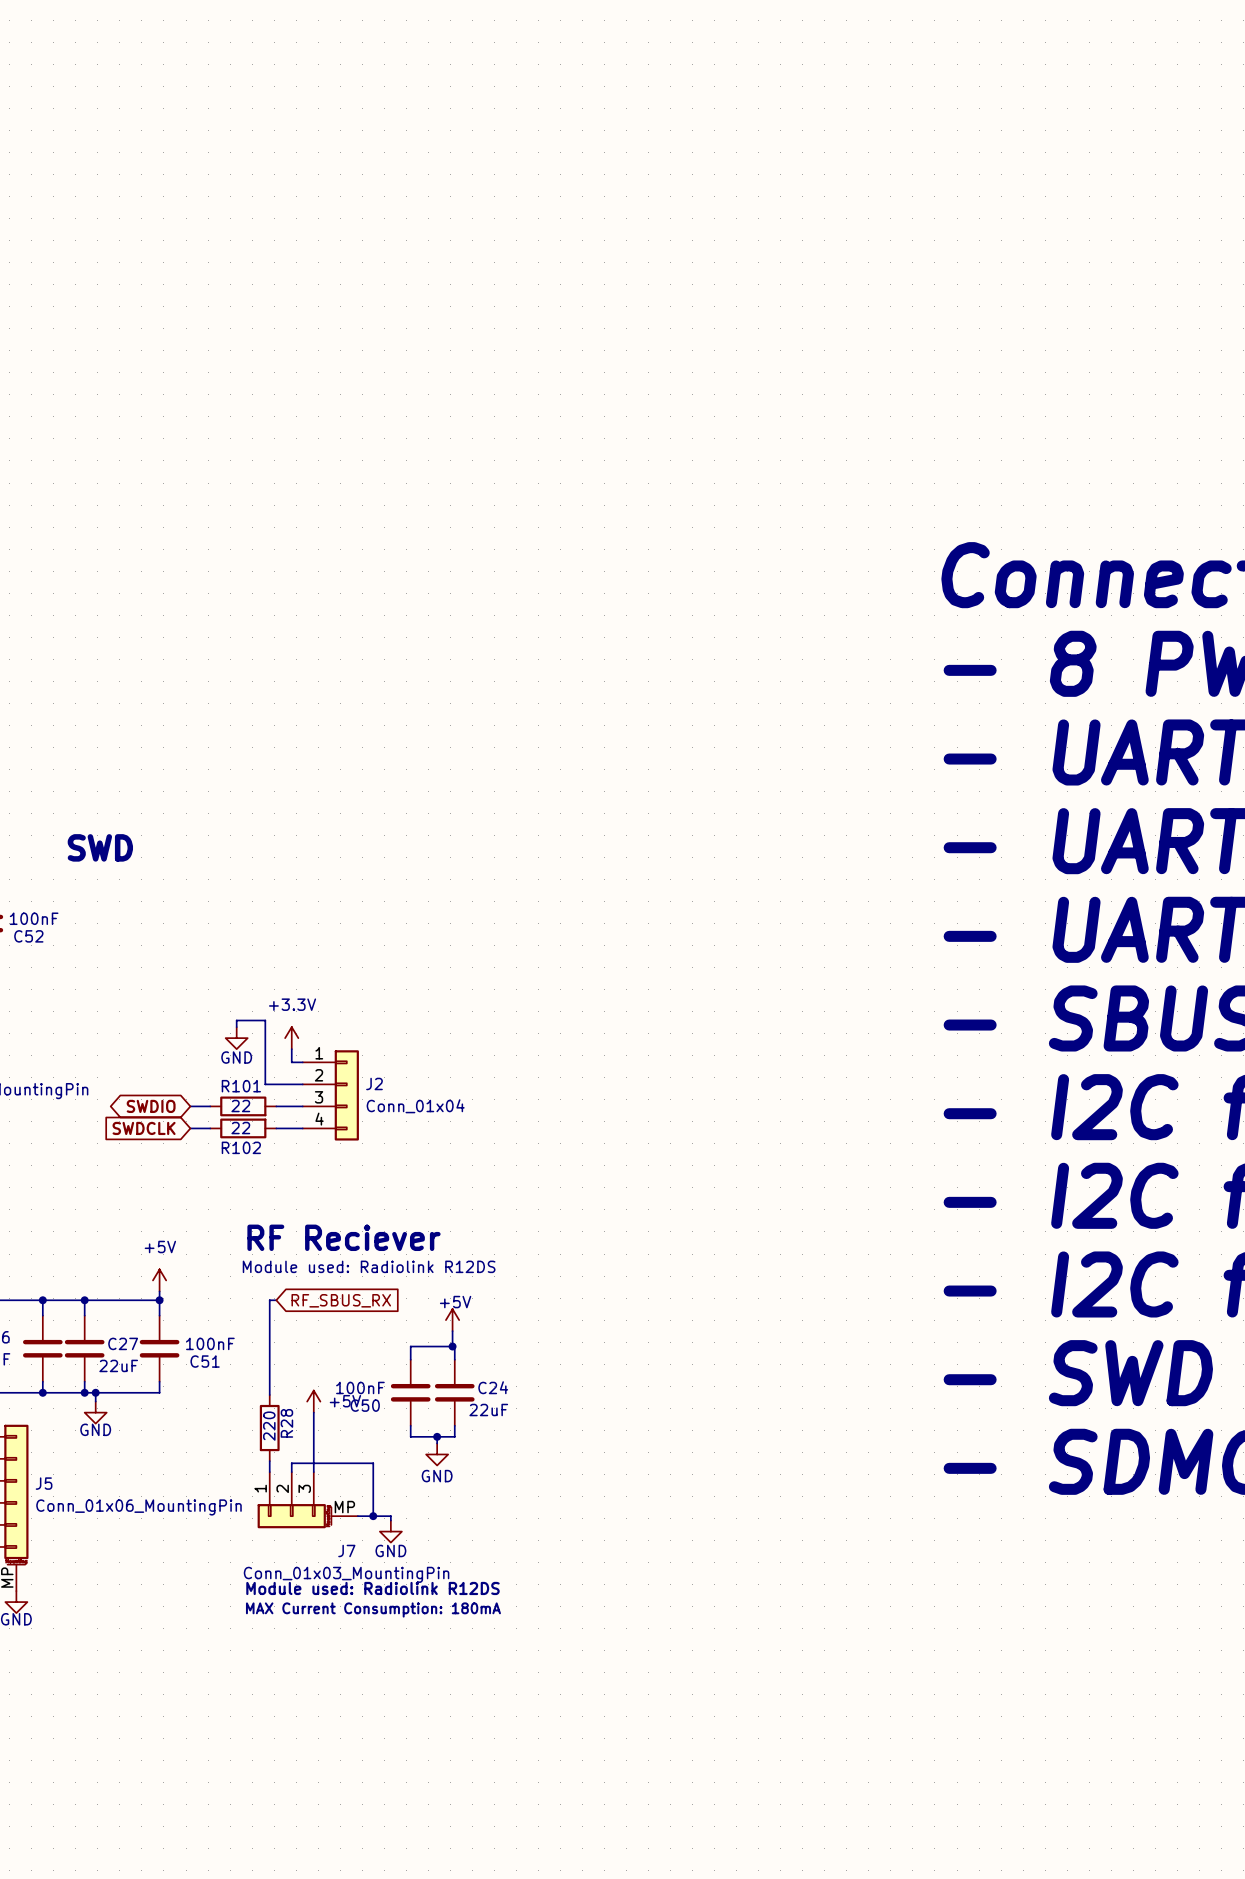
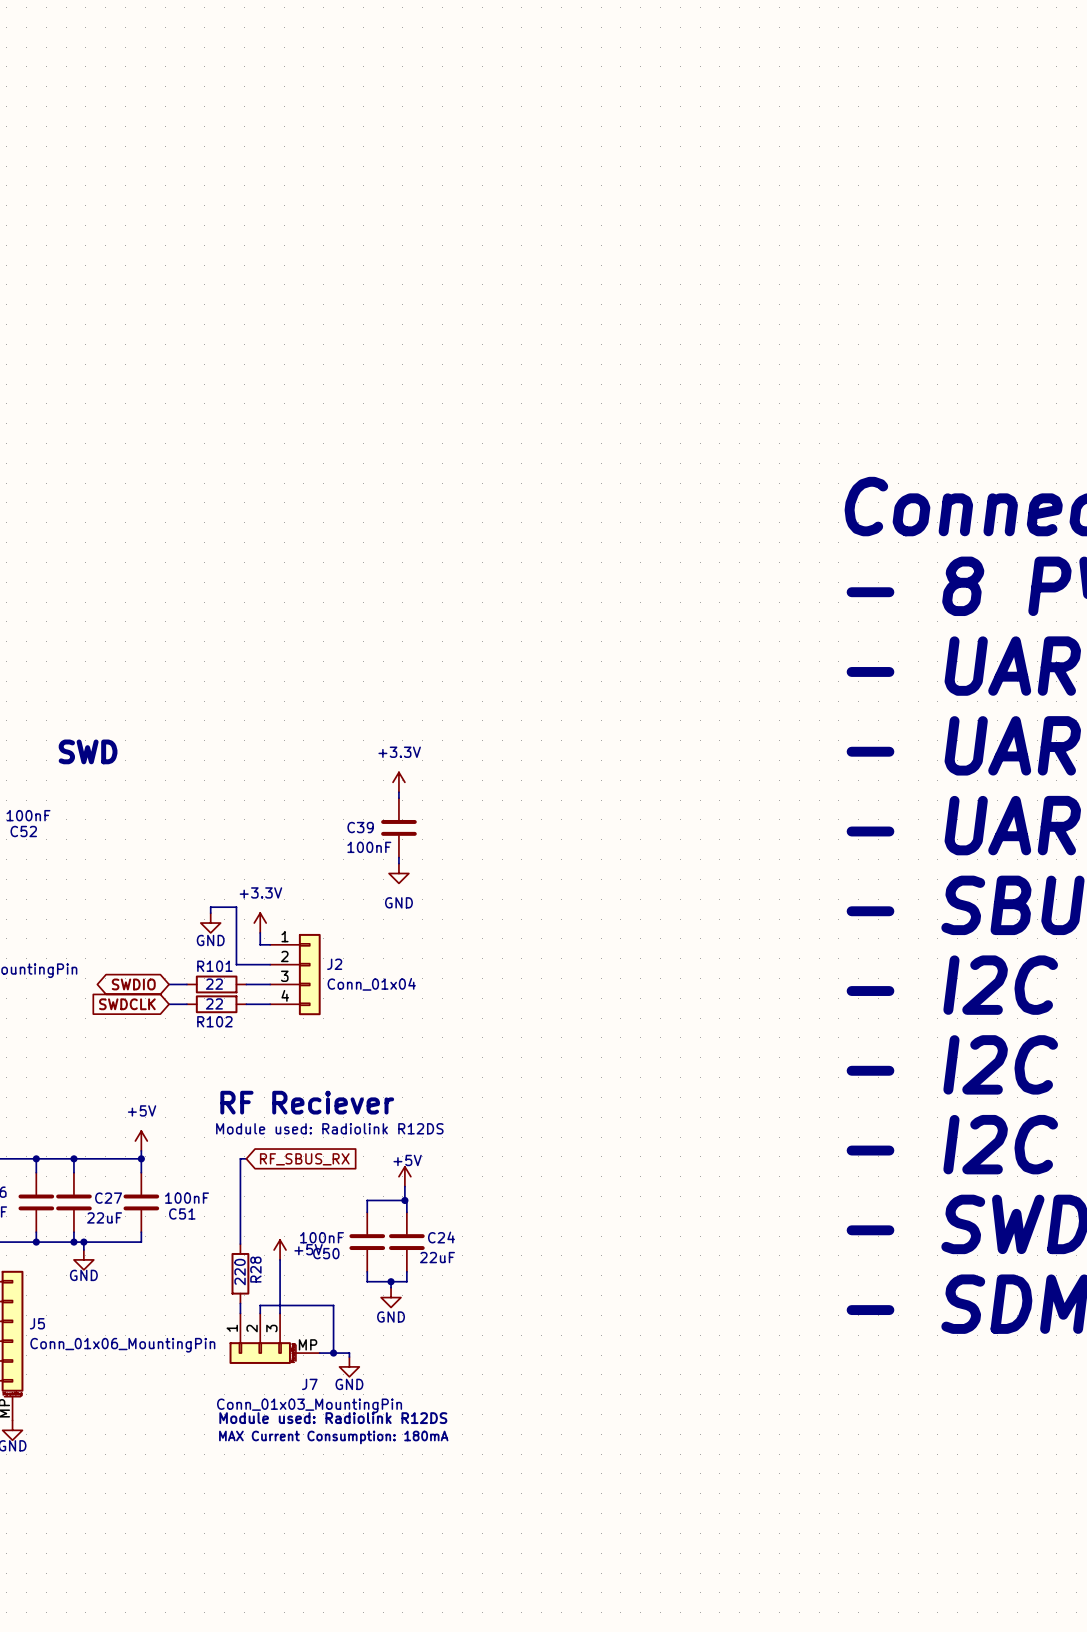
power symbol: none -> +3.3V (398, 782)
wire: none -> (398, 792) (398, 798)
C39: none -> 100nF (398, 827)
wire: none -> (398, 857) (398, 863)
power symbol: none -> GND (398, 873)

